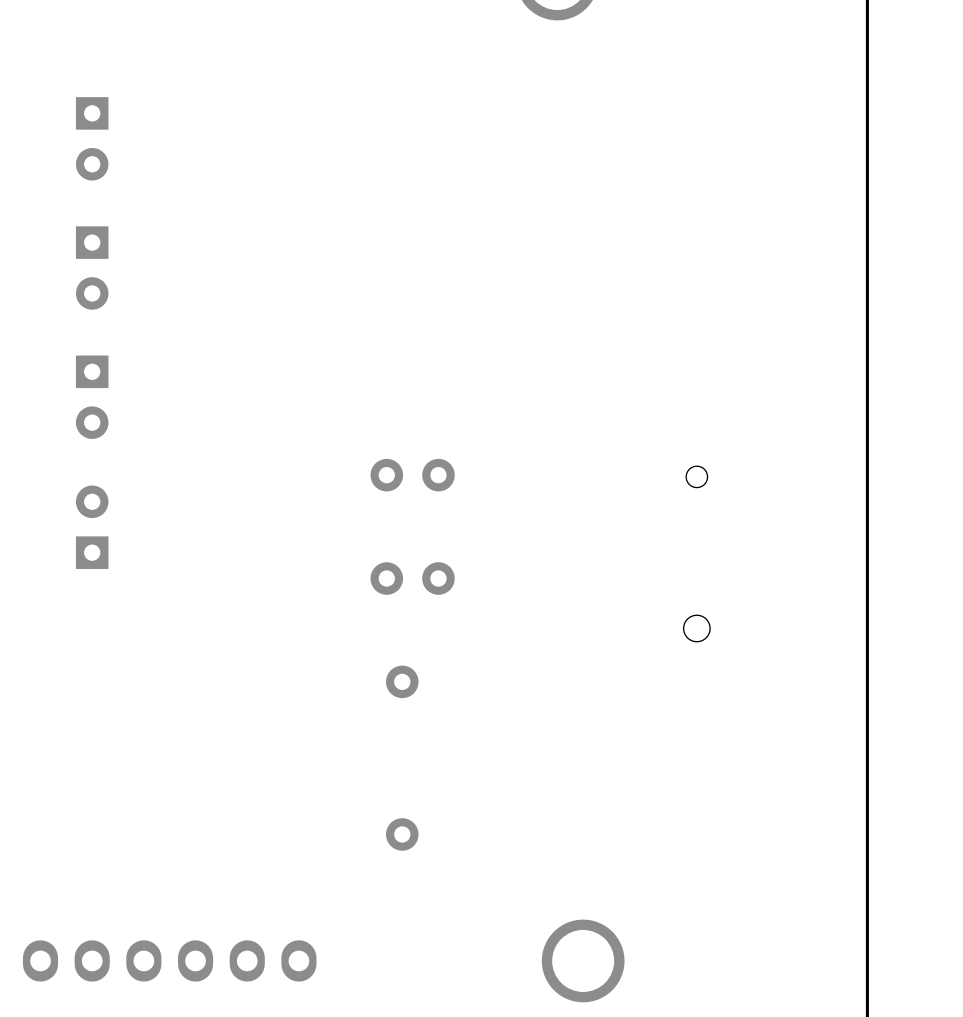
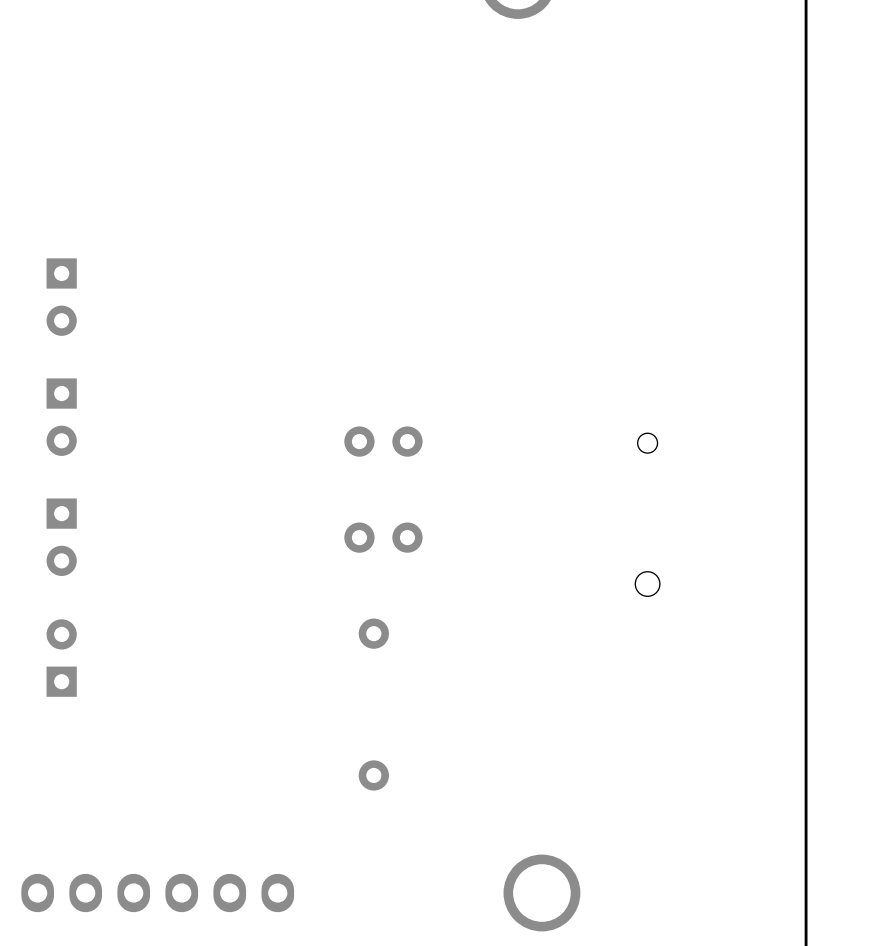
part: (92, 138) -> none
part: (92, 268) -> none
part: none -> (61, 297)
part: (92, 397) -> none
part: none -> (61, 417)
part: (92, 527) -> none
part: none -> (61, 537)
part: none -> (61, 658)

